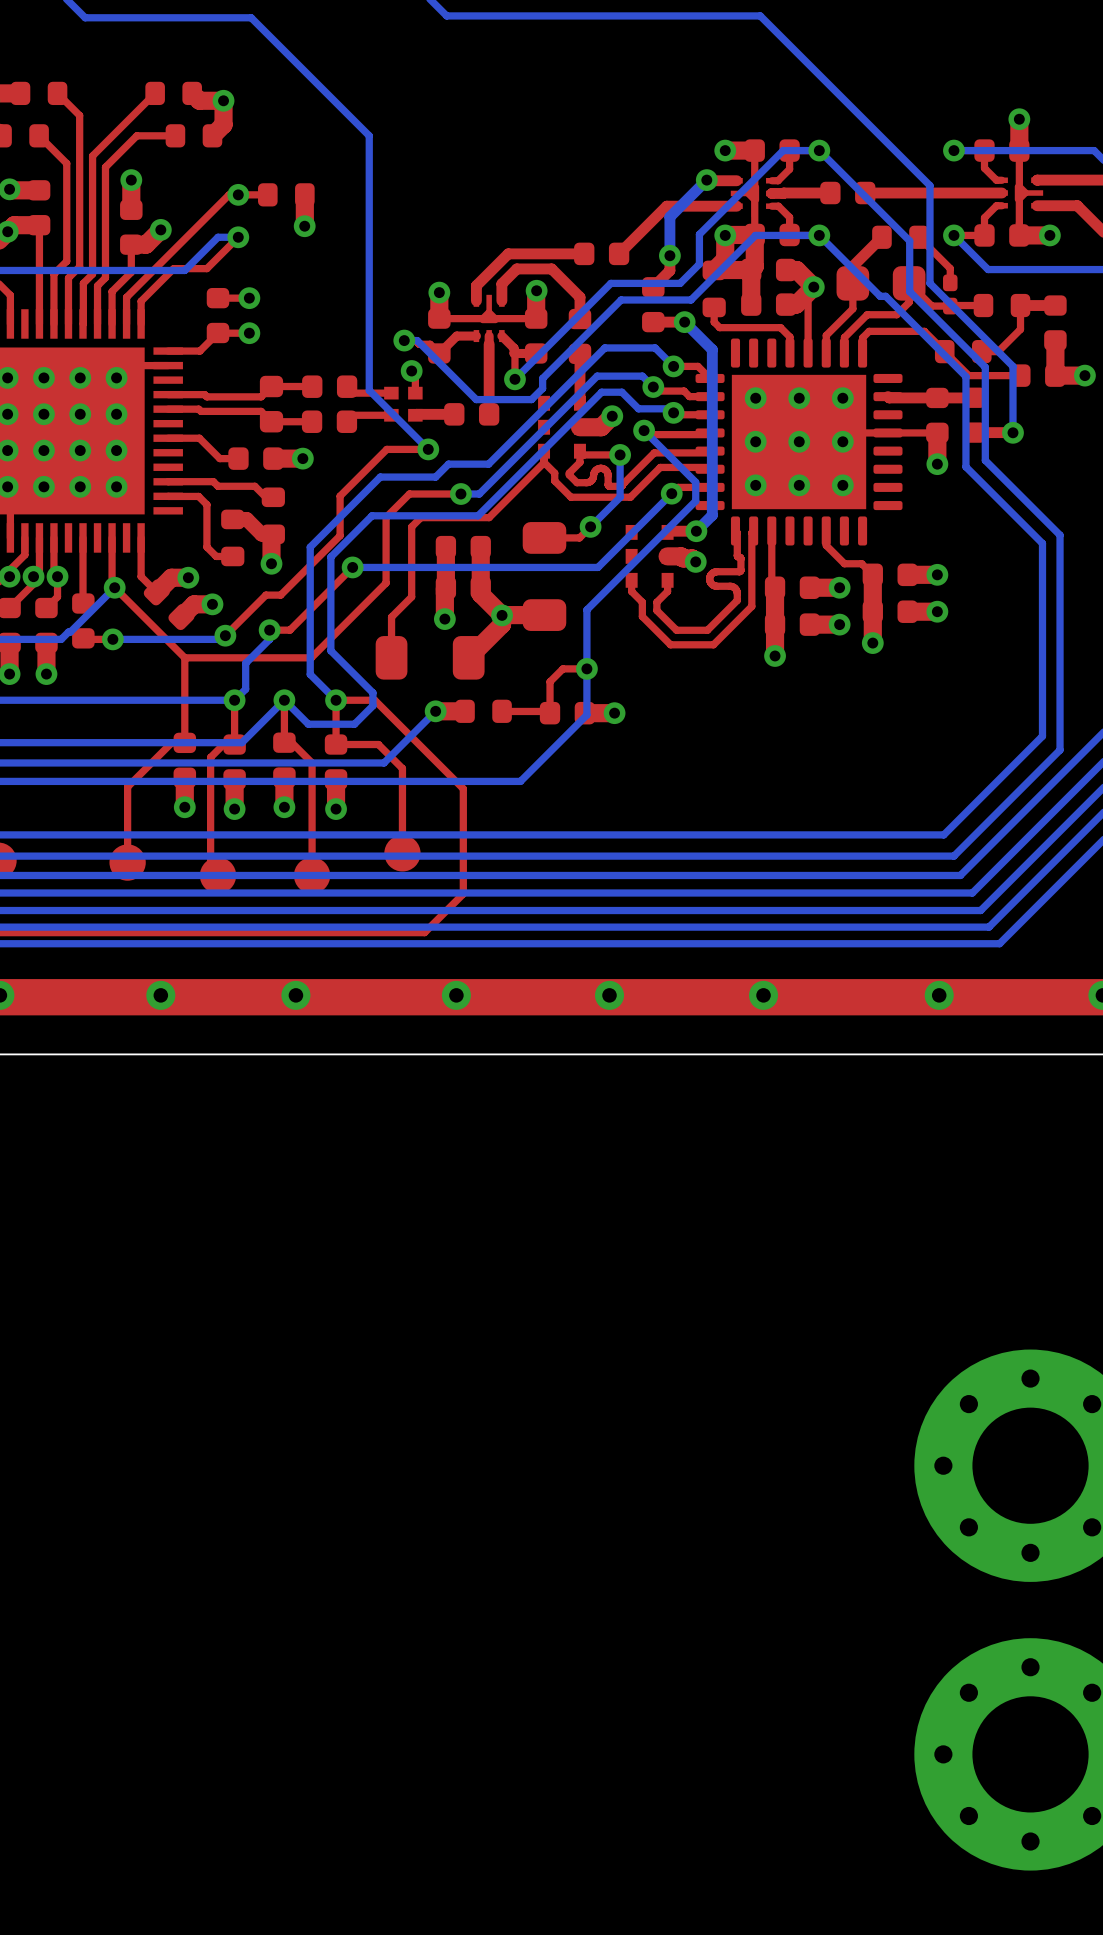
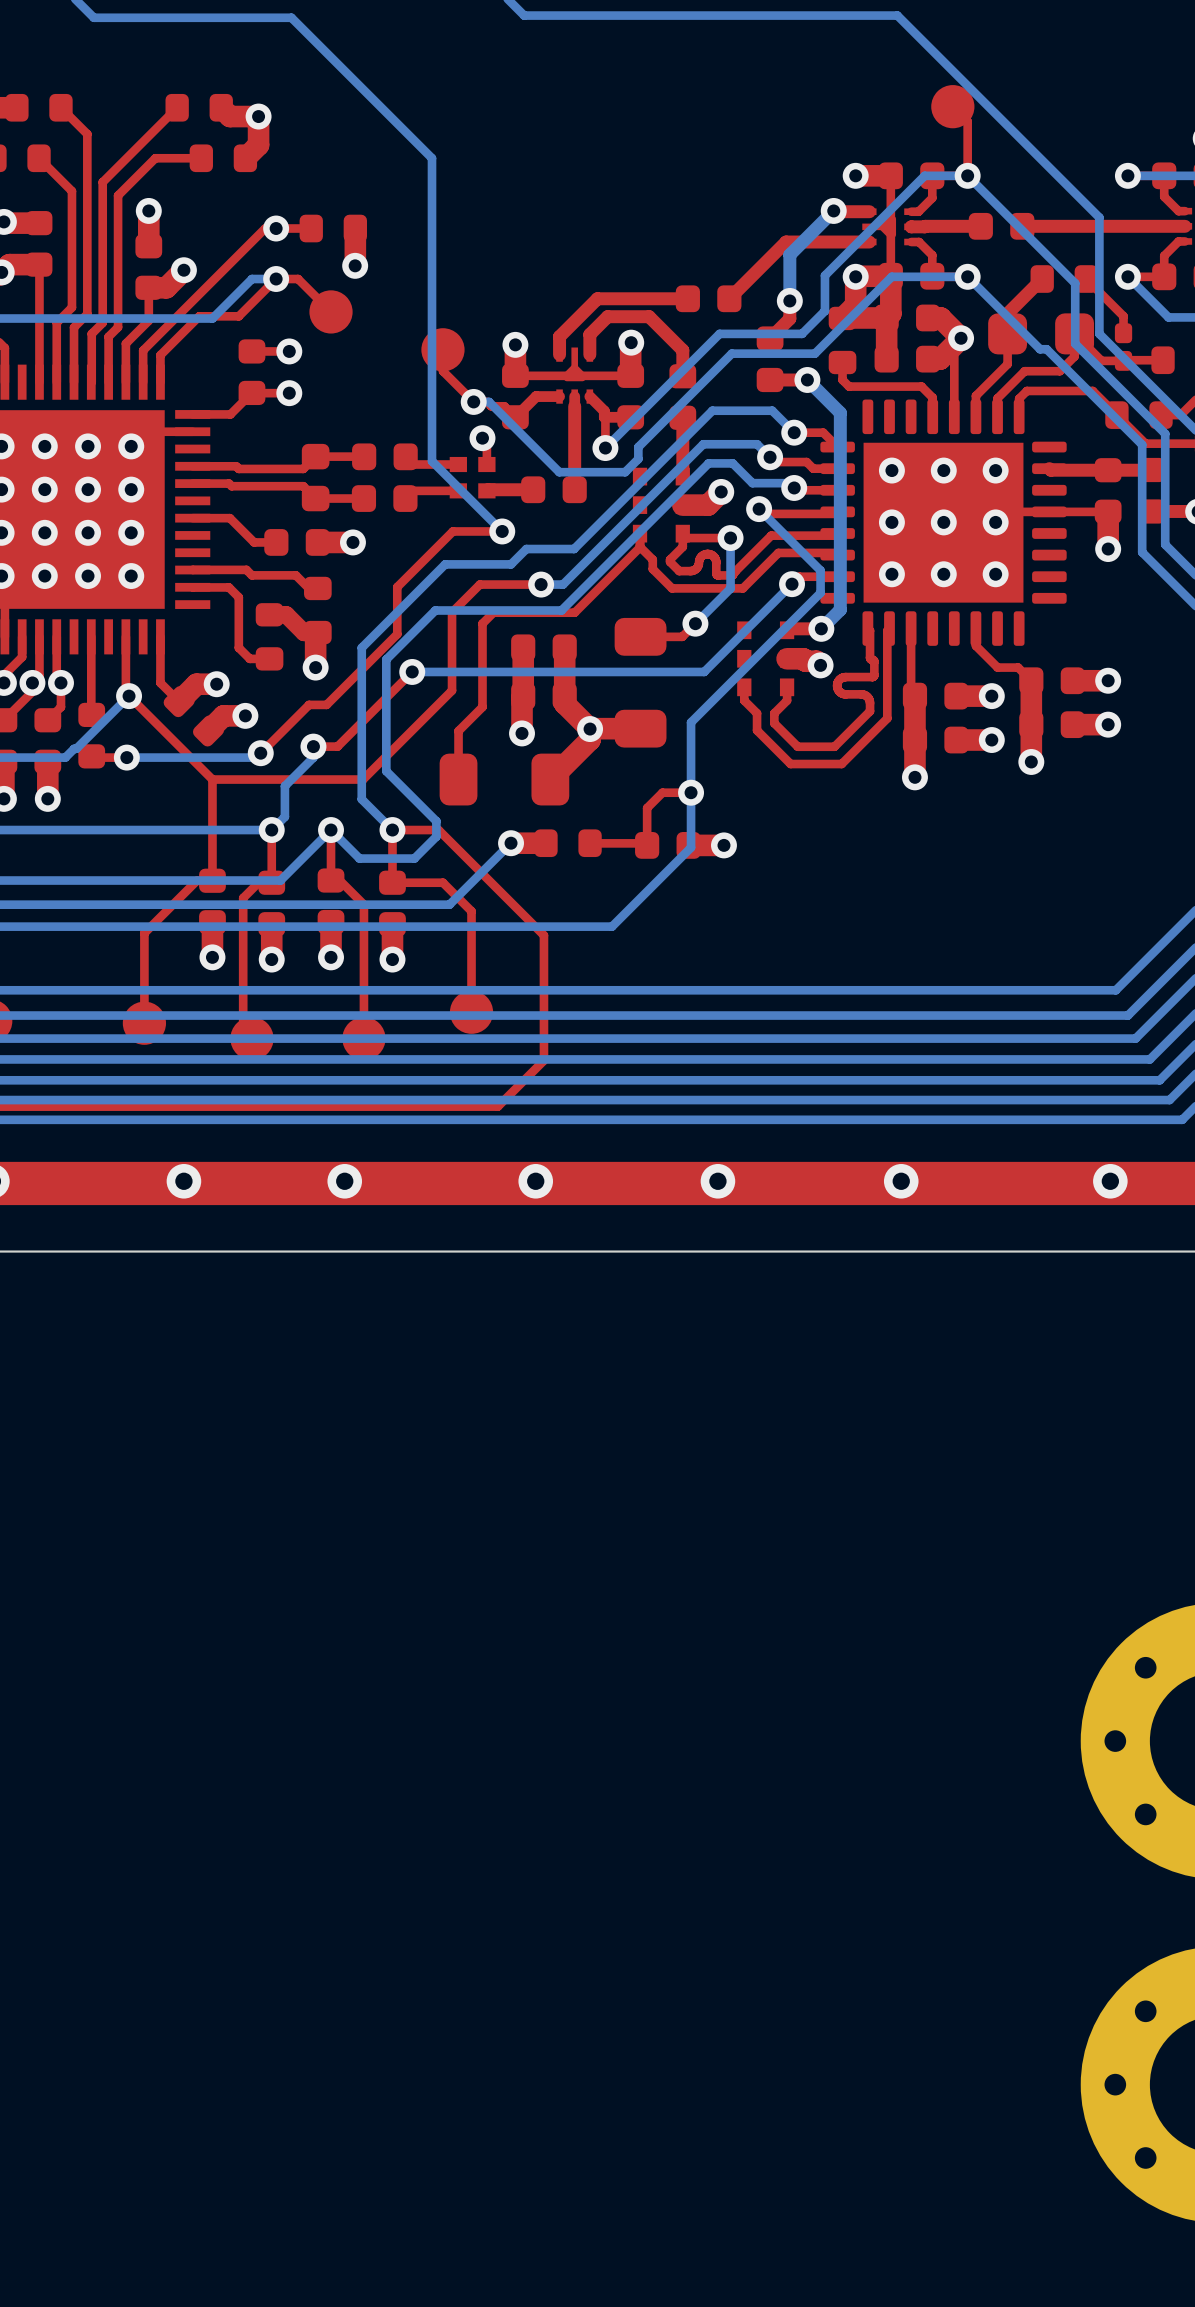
top track: none -> (952, 106) (967, 121) (967, 175)
part: none -> (952, 106)
top track: none -> (276, 279) (298, 279) (331, 311)
part: none -> (331, 311)
top track: none -> (442, 349) (442, 371) (473, 401)
part: none -> (442, 349)

